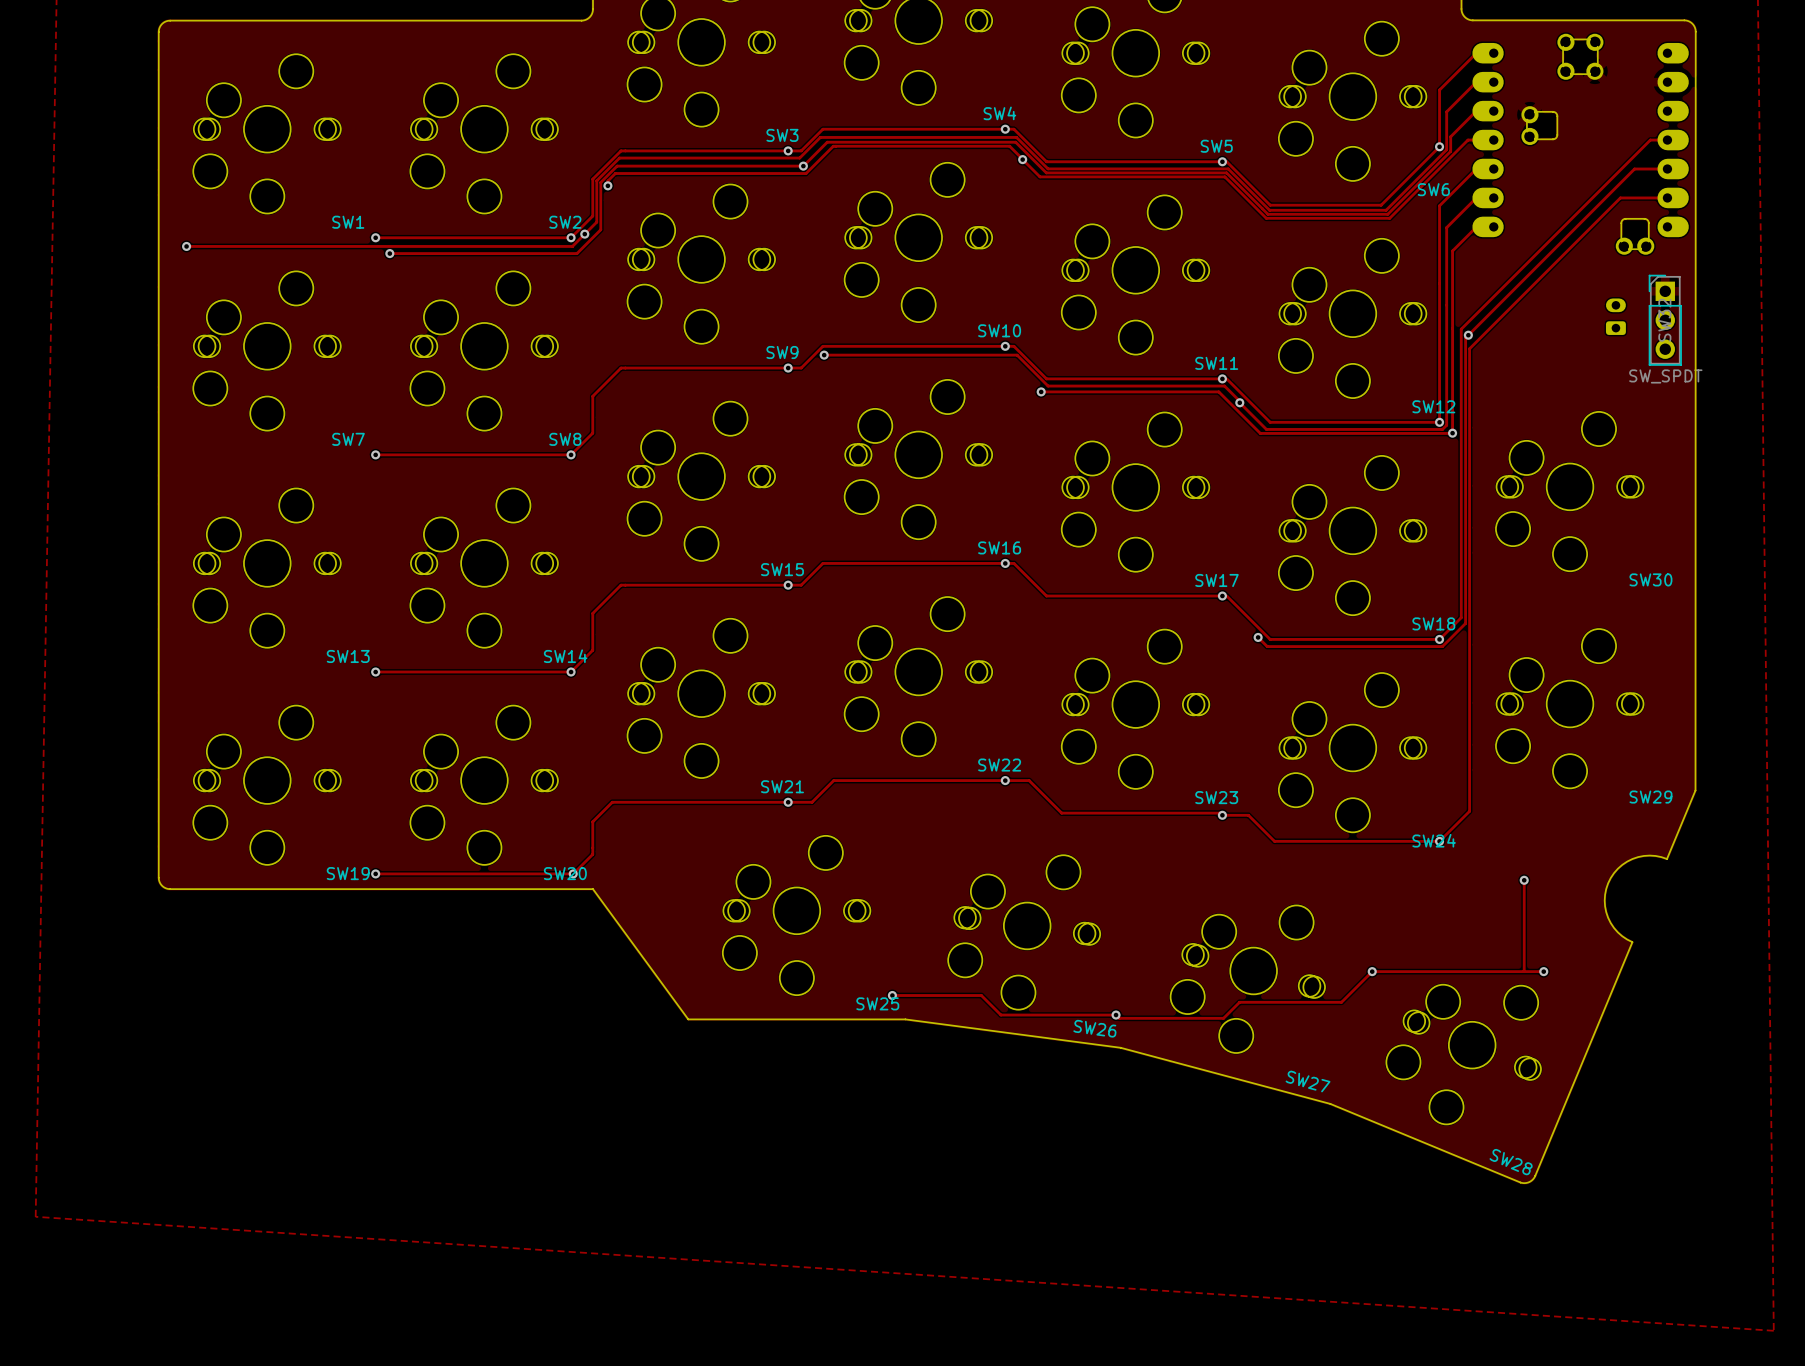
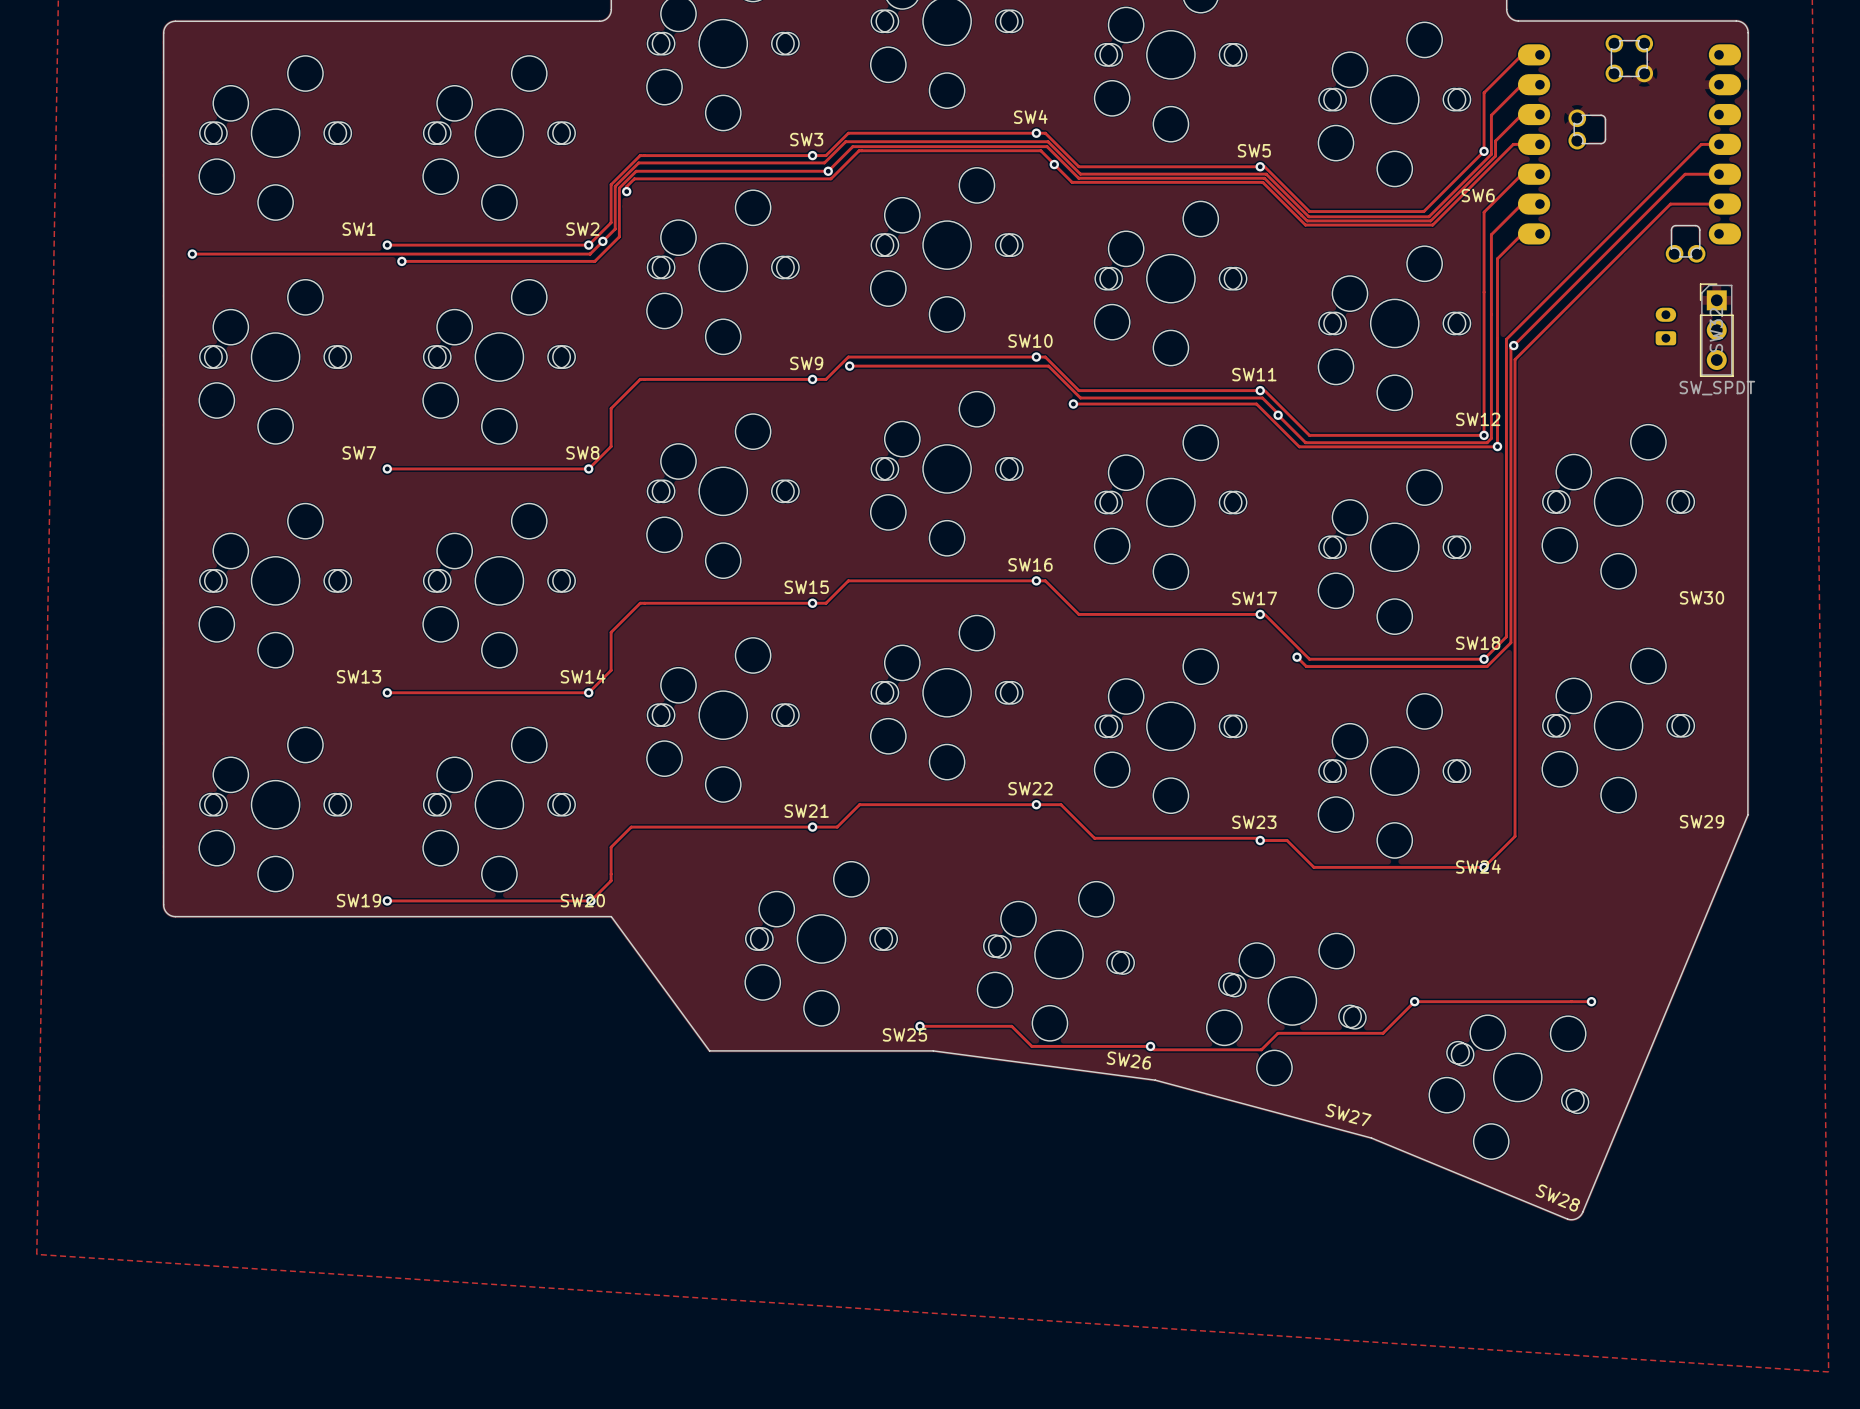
board edge: (1667, 859) (1649, 855) (1632, 858) (1617, 868) (1608, 883) (1604, 900) (1608, 917) (1617, 932) (1632, 942) -> (1718, 885) (1682, 971)
track: (1524, 880) (1524, 971) -> none
via: (1524, 880) -> none

